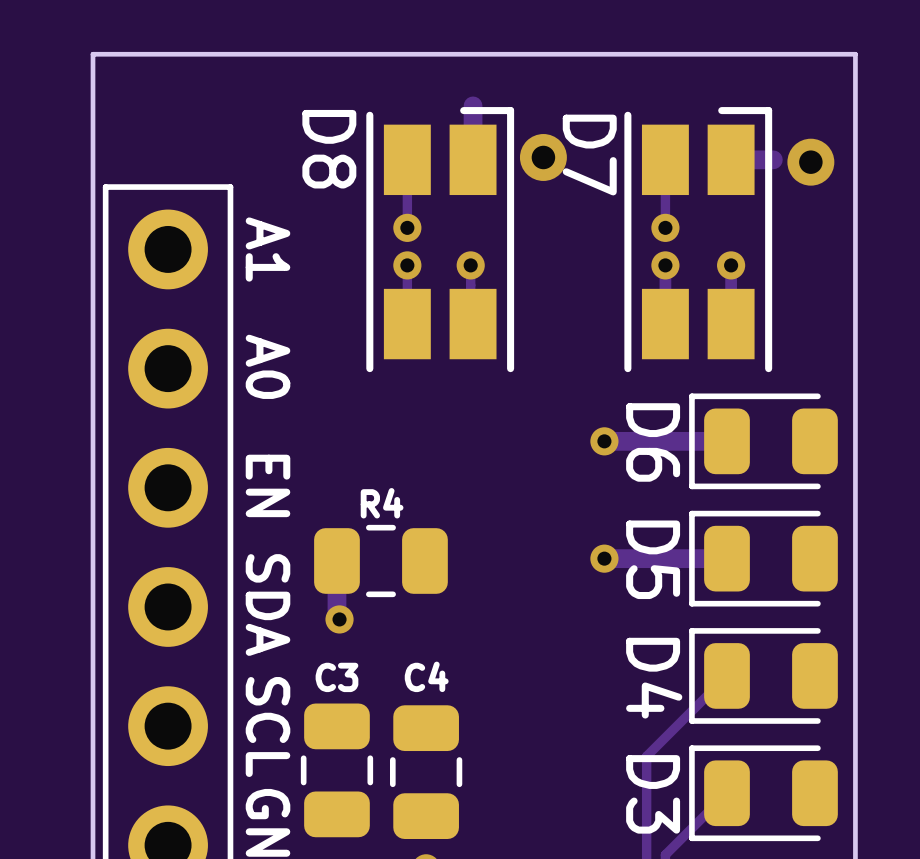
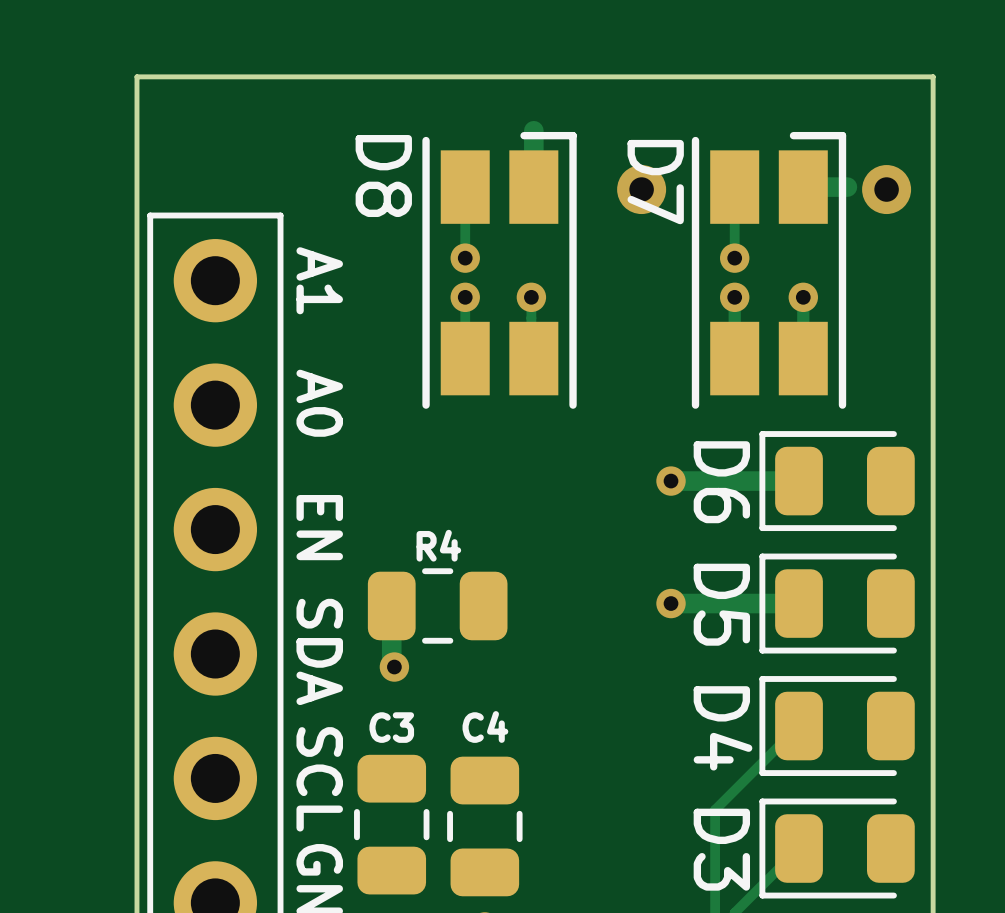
via position: (543, 157) -> (641, 189)

